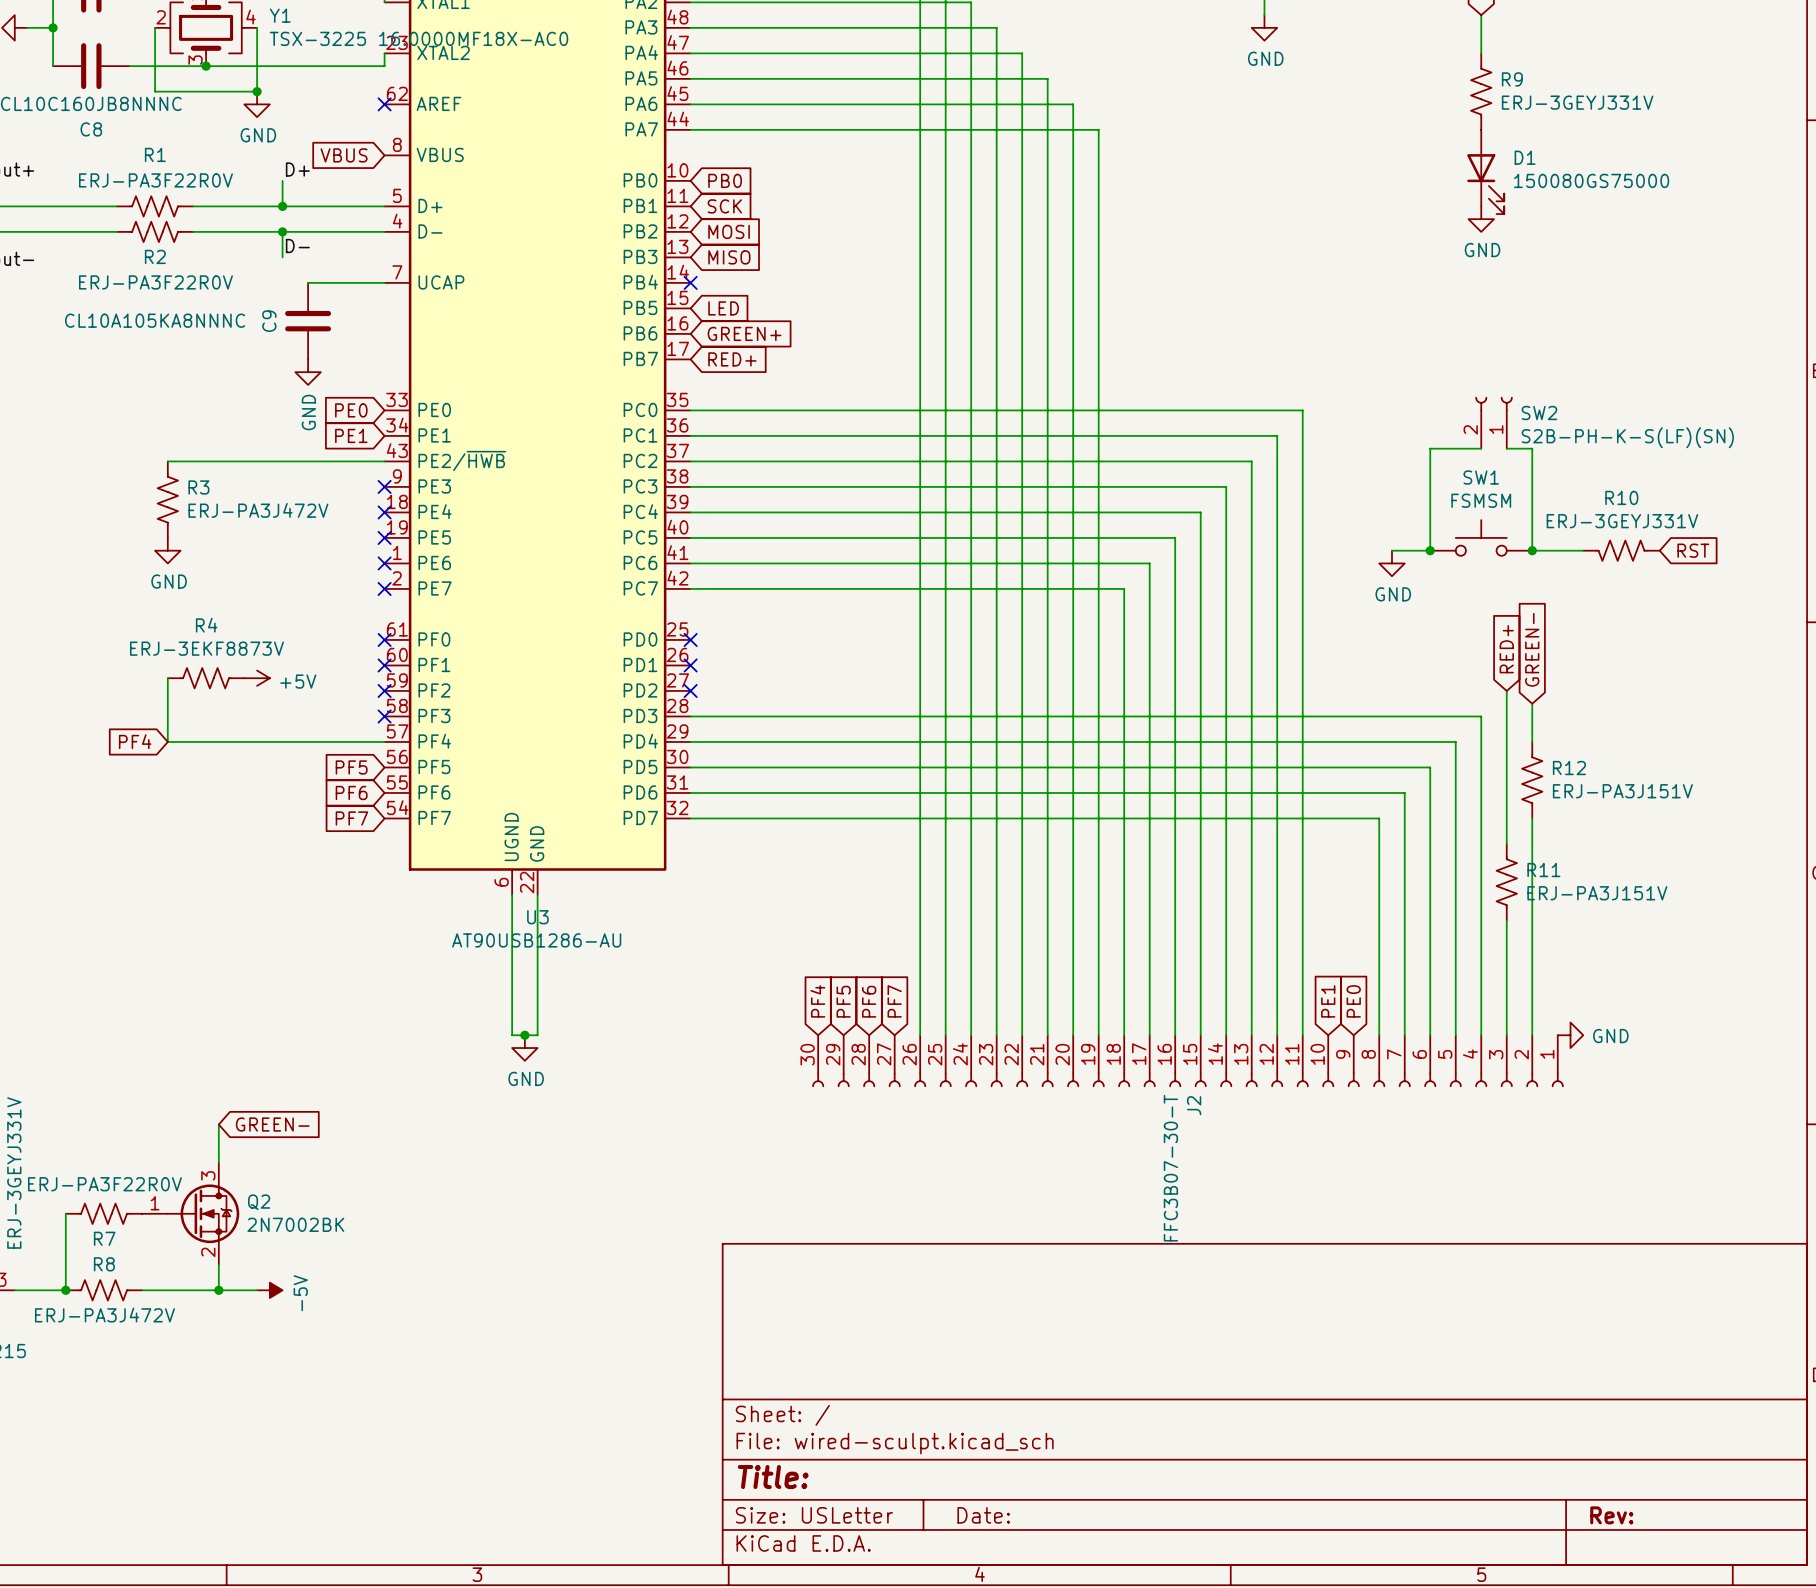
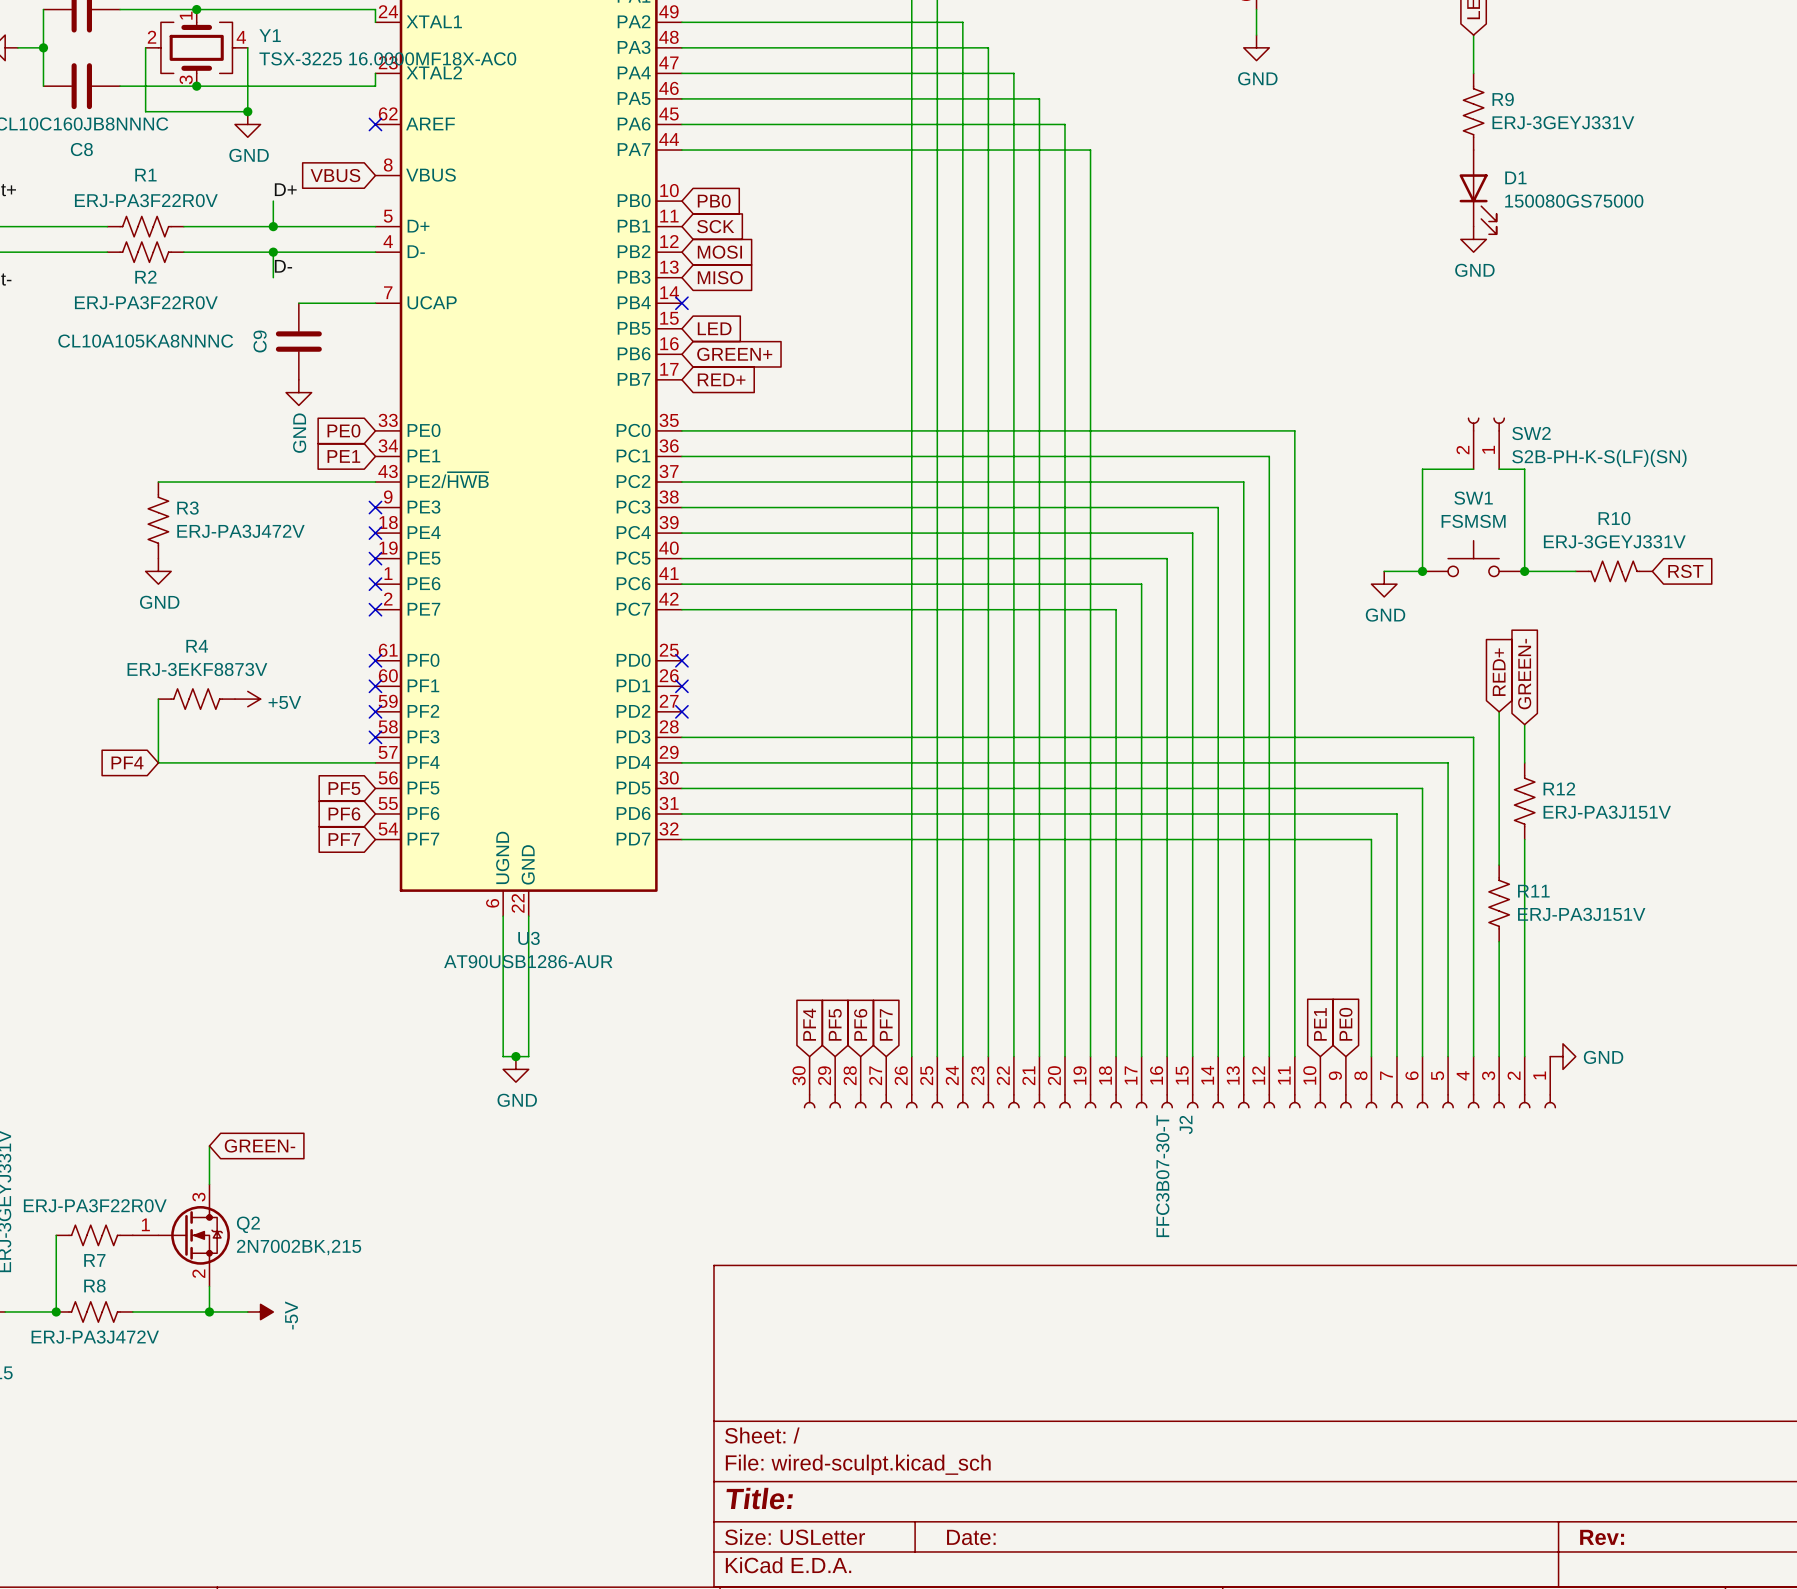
U3 value: AT90USB1286-AU (536, 940) -> AT90USB1286-AUR (528, 961)
Q2 value: 2N7002BK (295, 1224) -> 2N7002BK,215 (299, 1247)

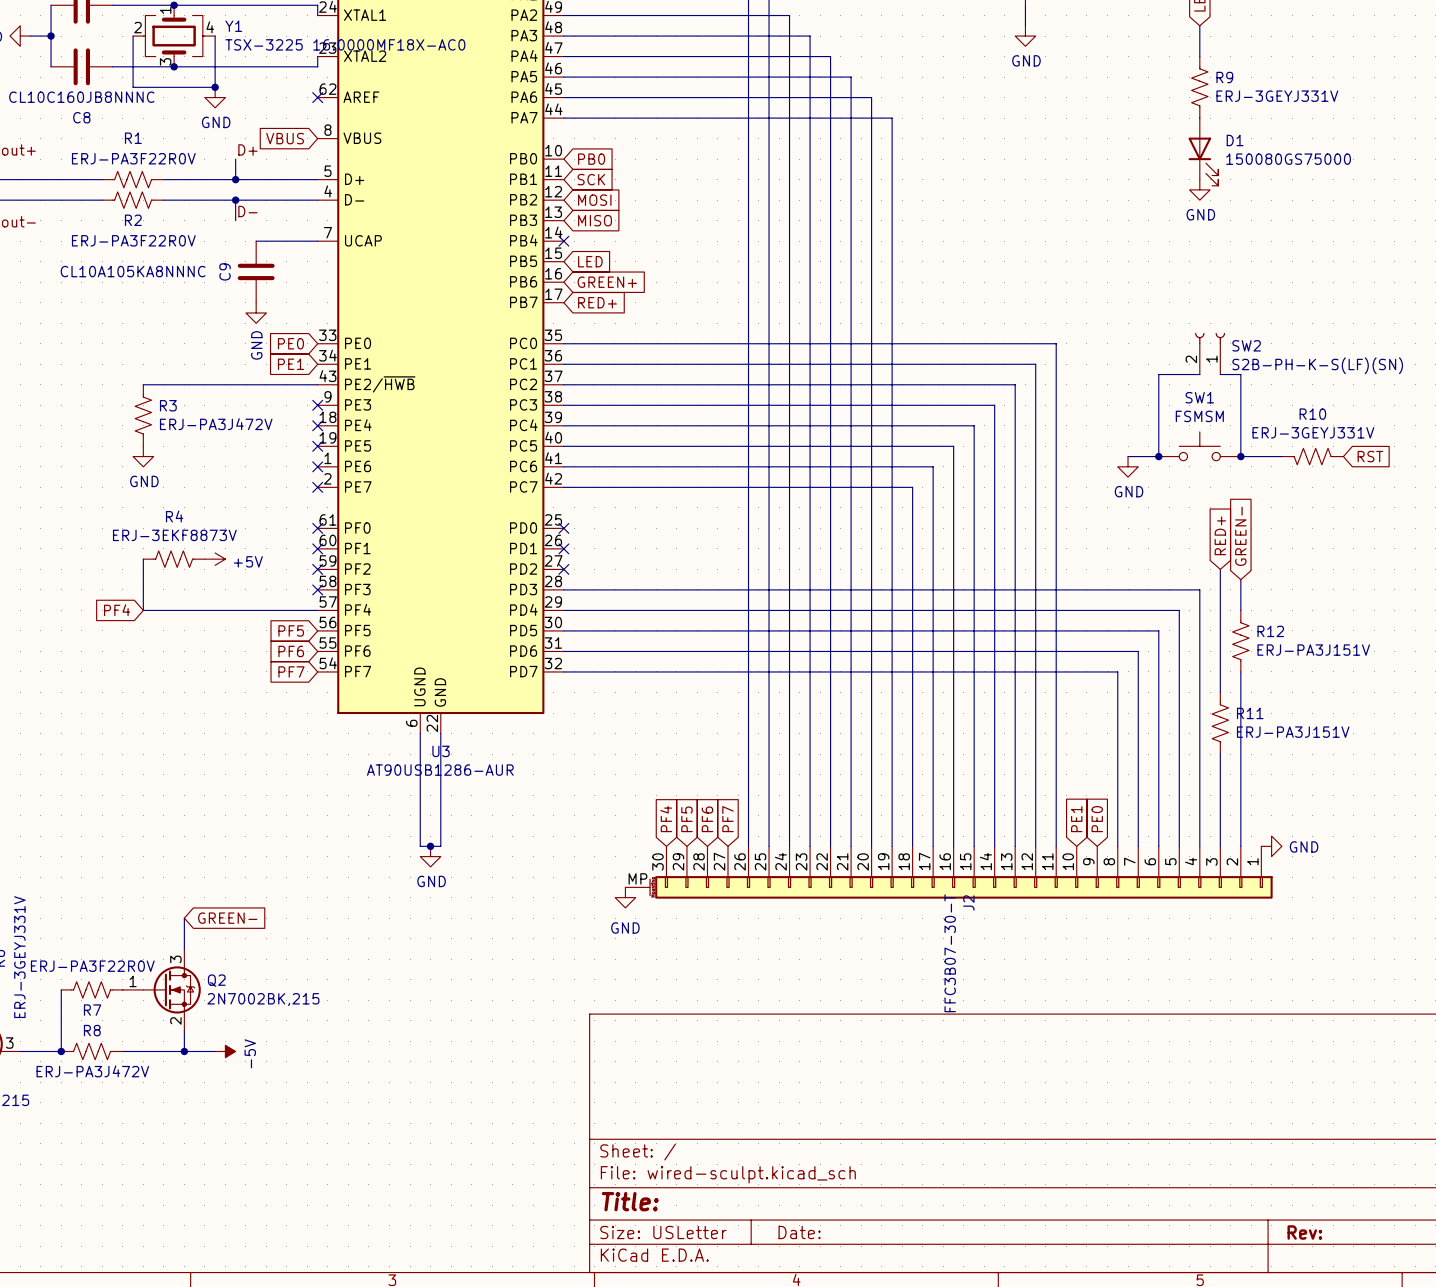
J2 symbol: [803, 1056, 1557, 1109] -> [625, 846, 1273, 899]
power symbol: none -> GND (625, 897)

